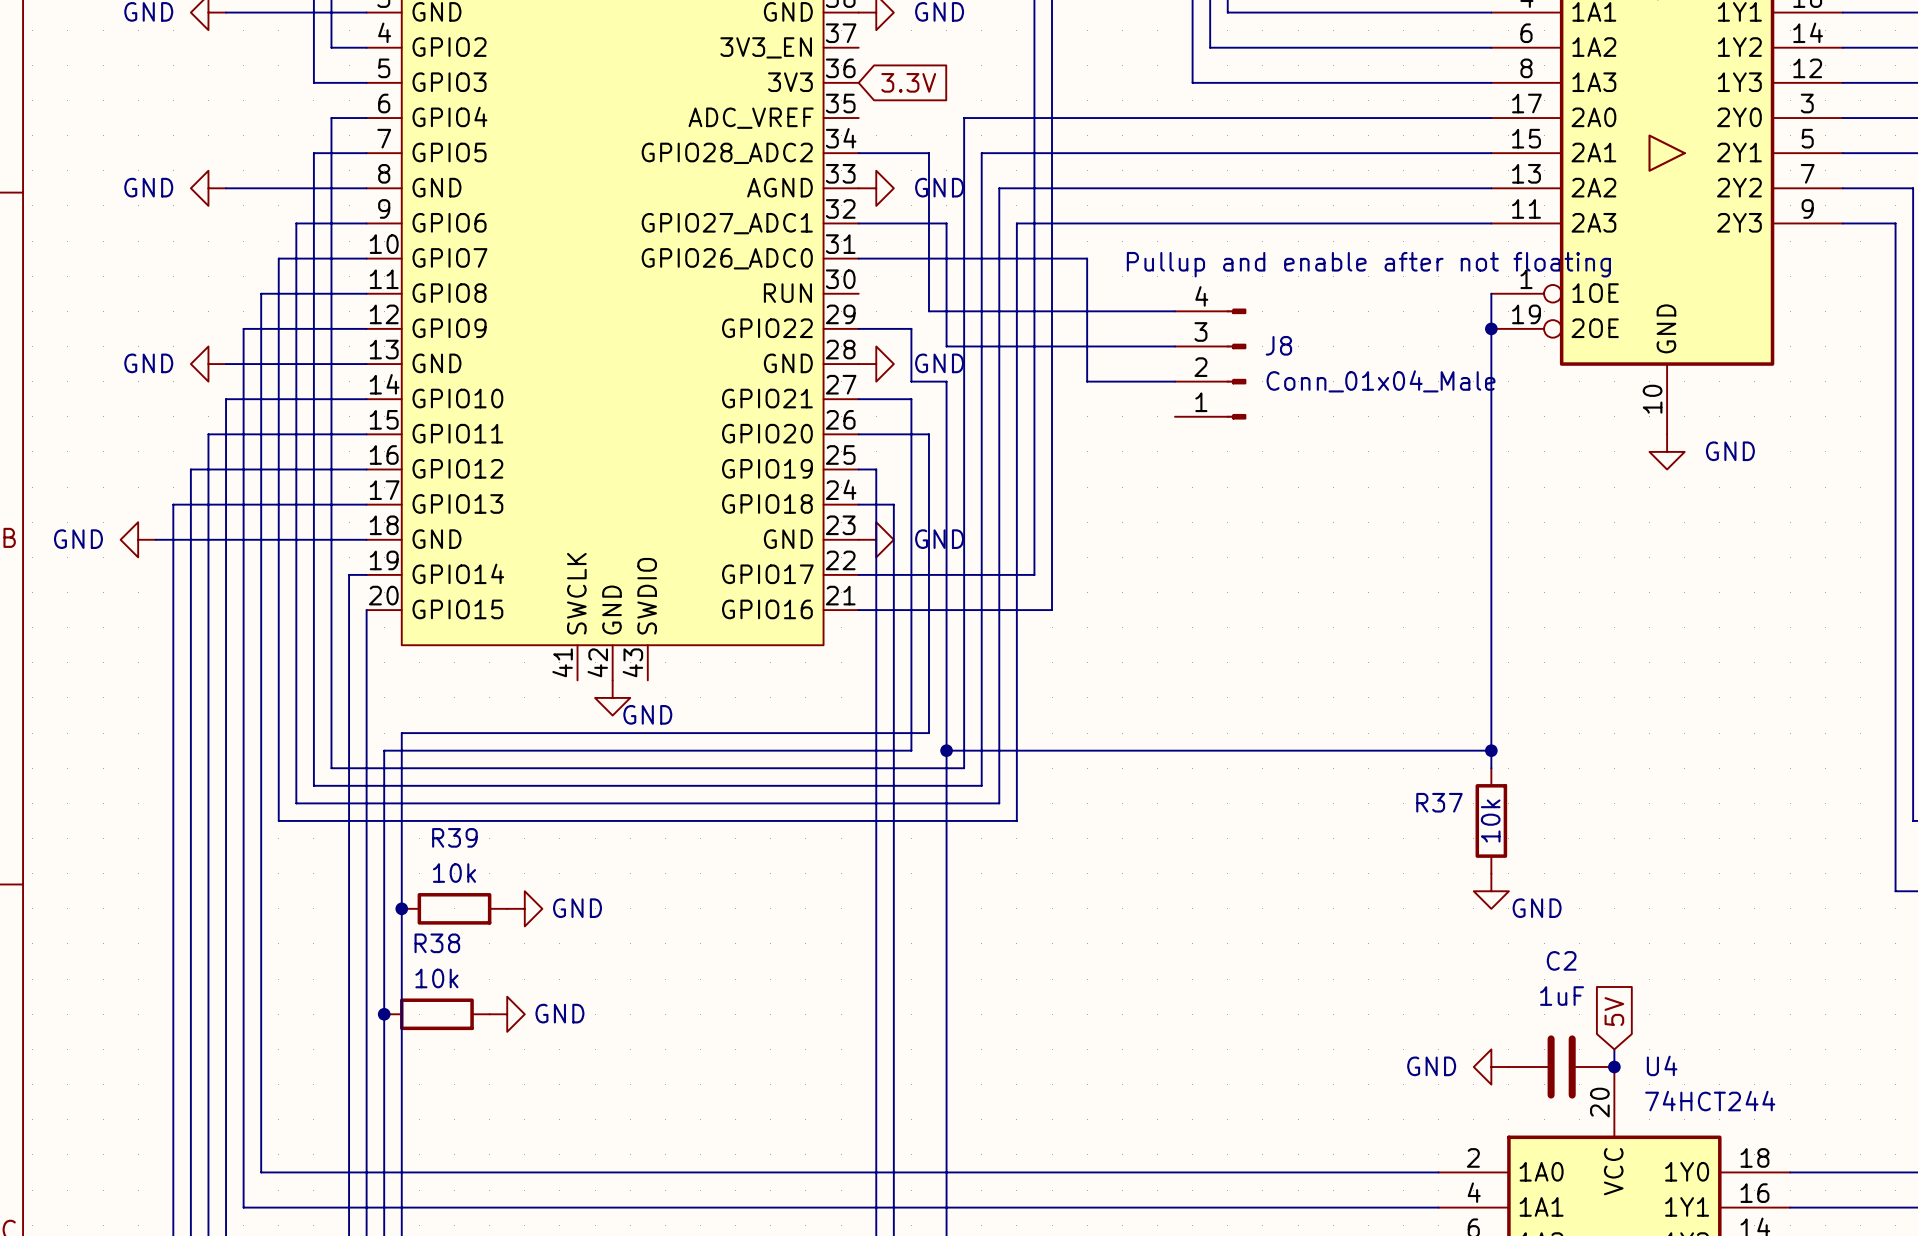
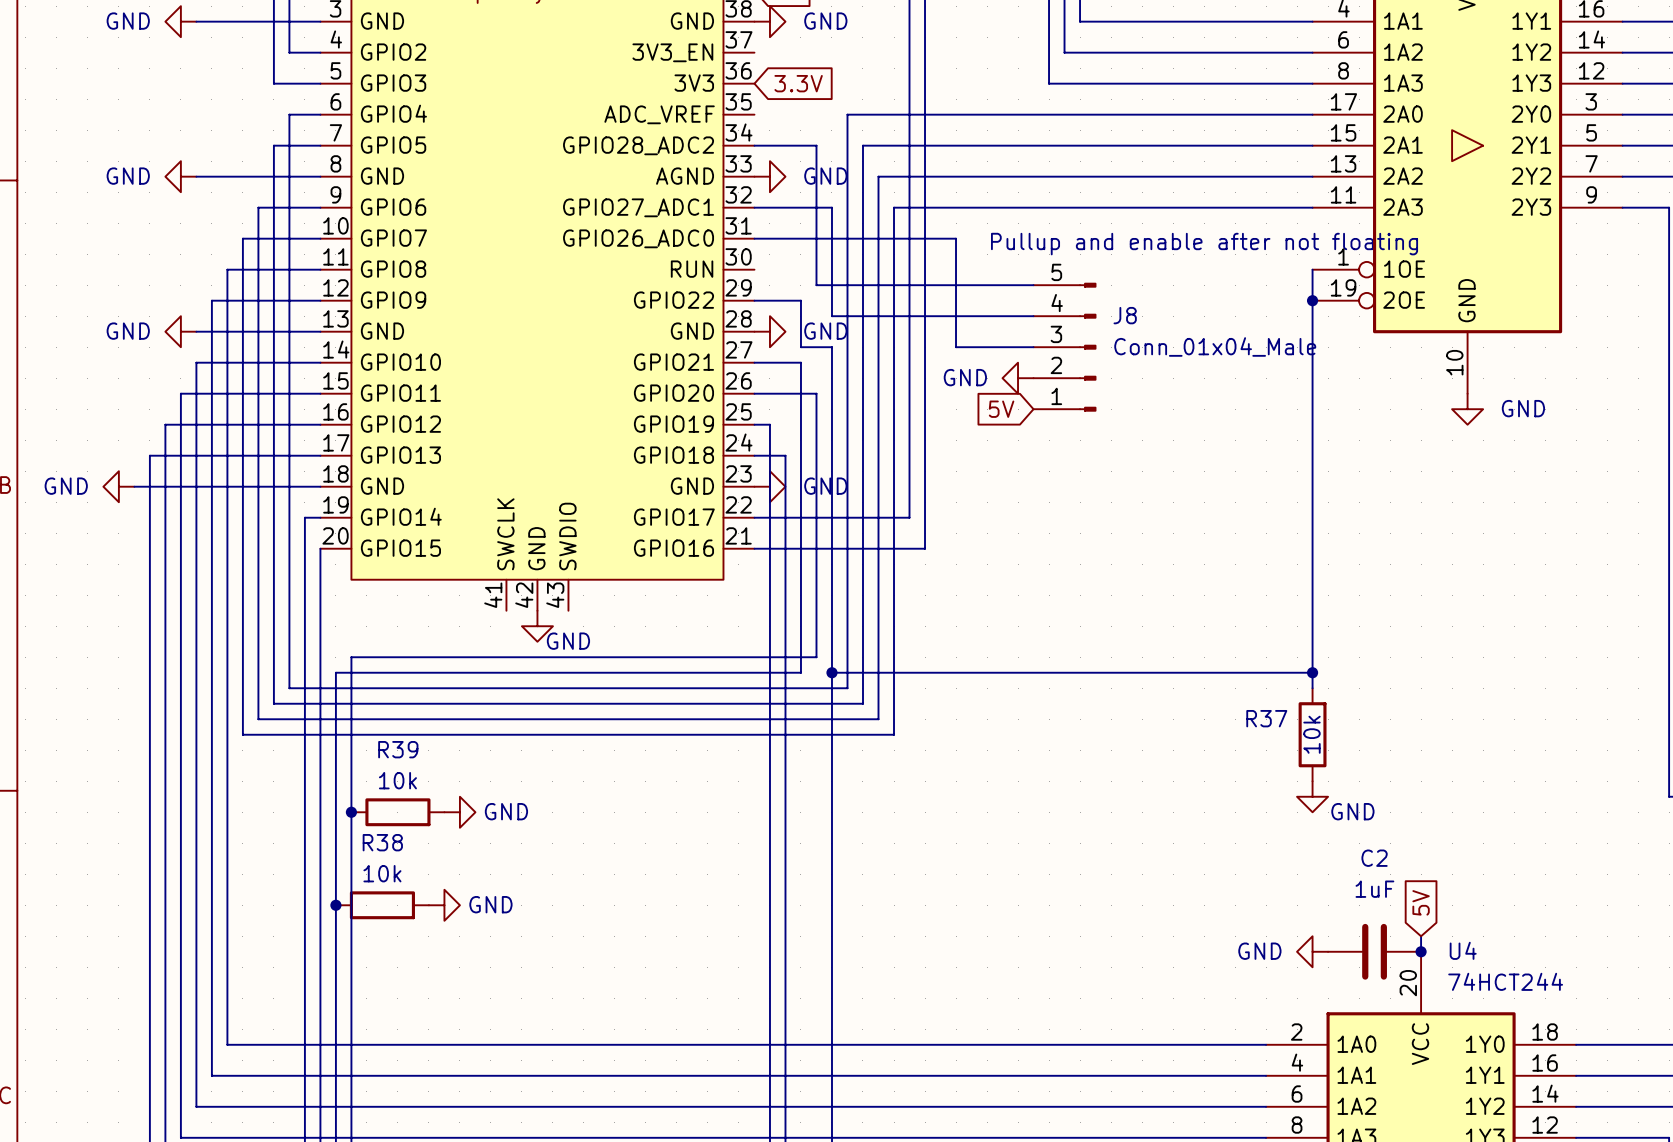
J8 symbol: [1175, 308, 1247, 420] -> [1033, 282, 1097, 412]
power symbol: none -> GND (1018, 378)
global label: none -> 5V (1001, 409)

